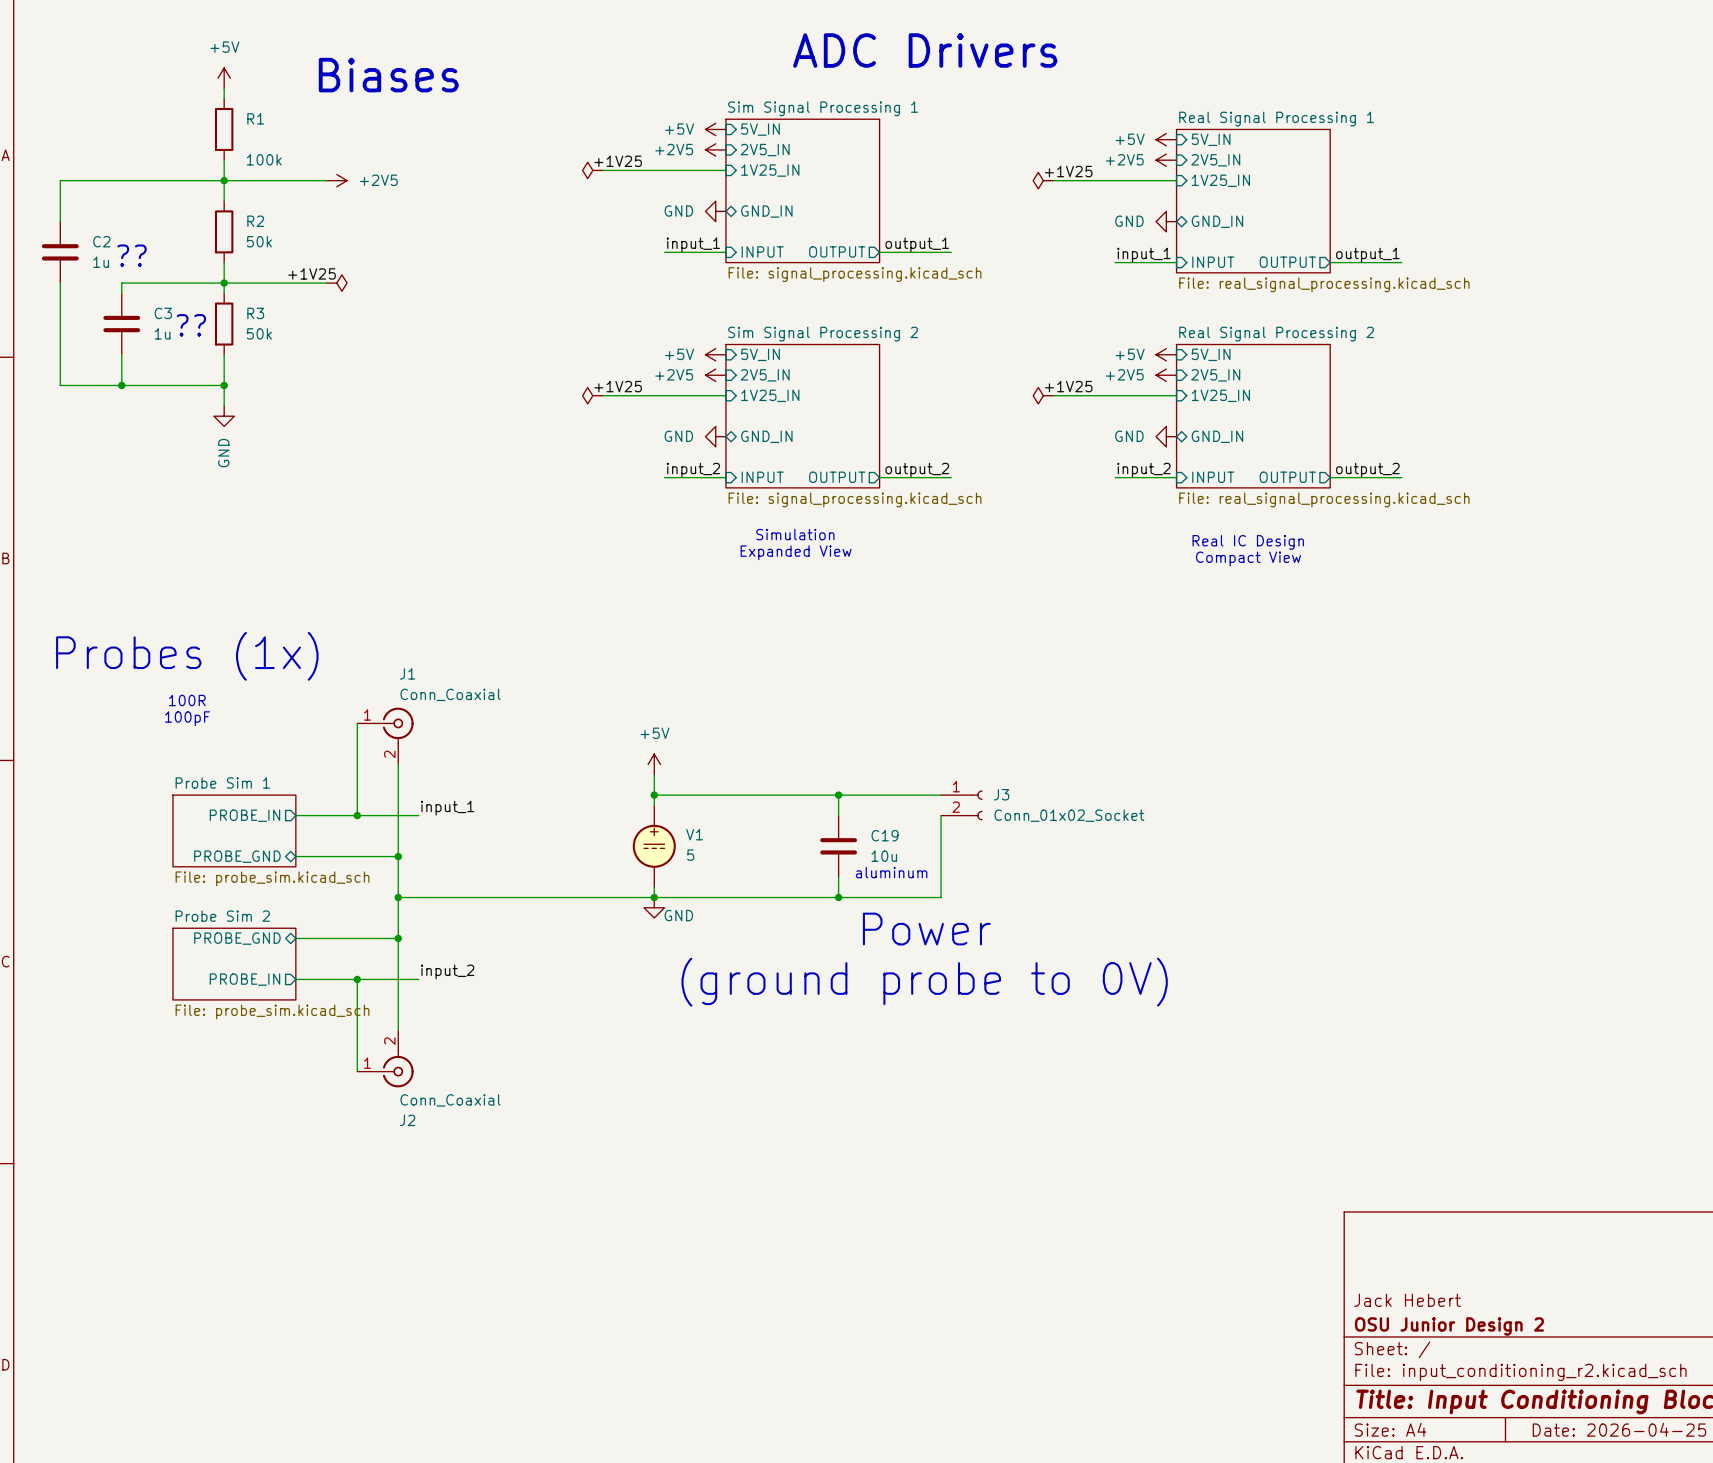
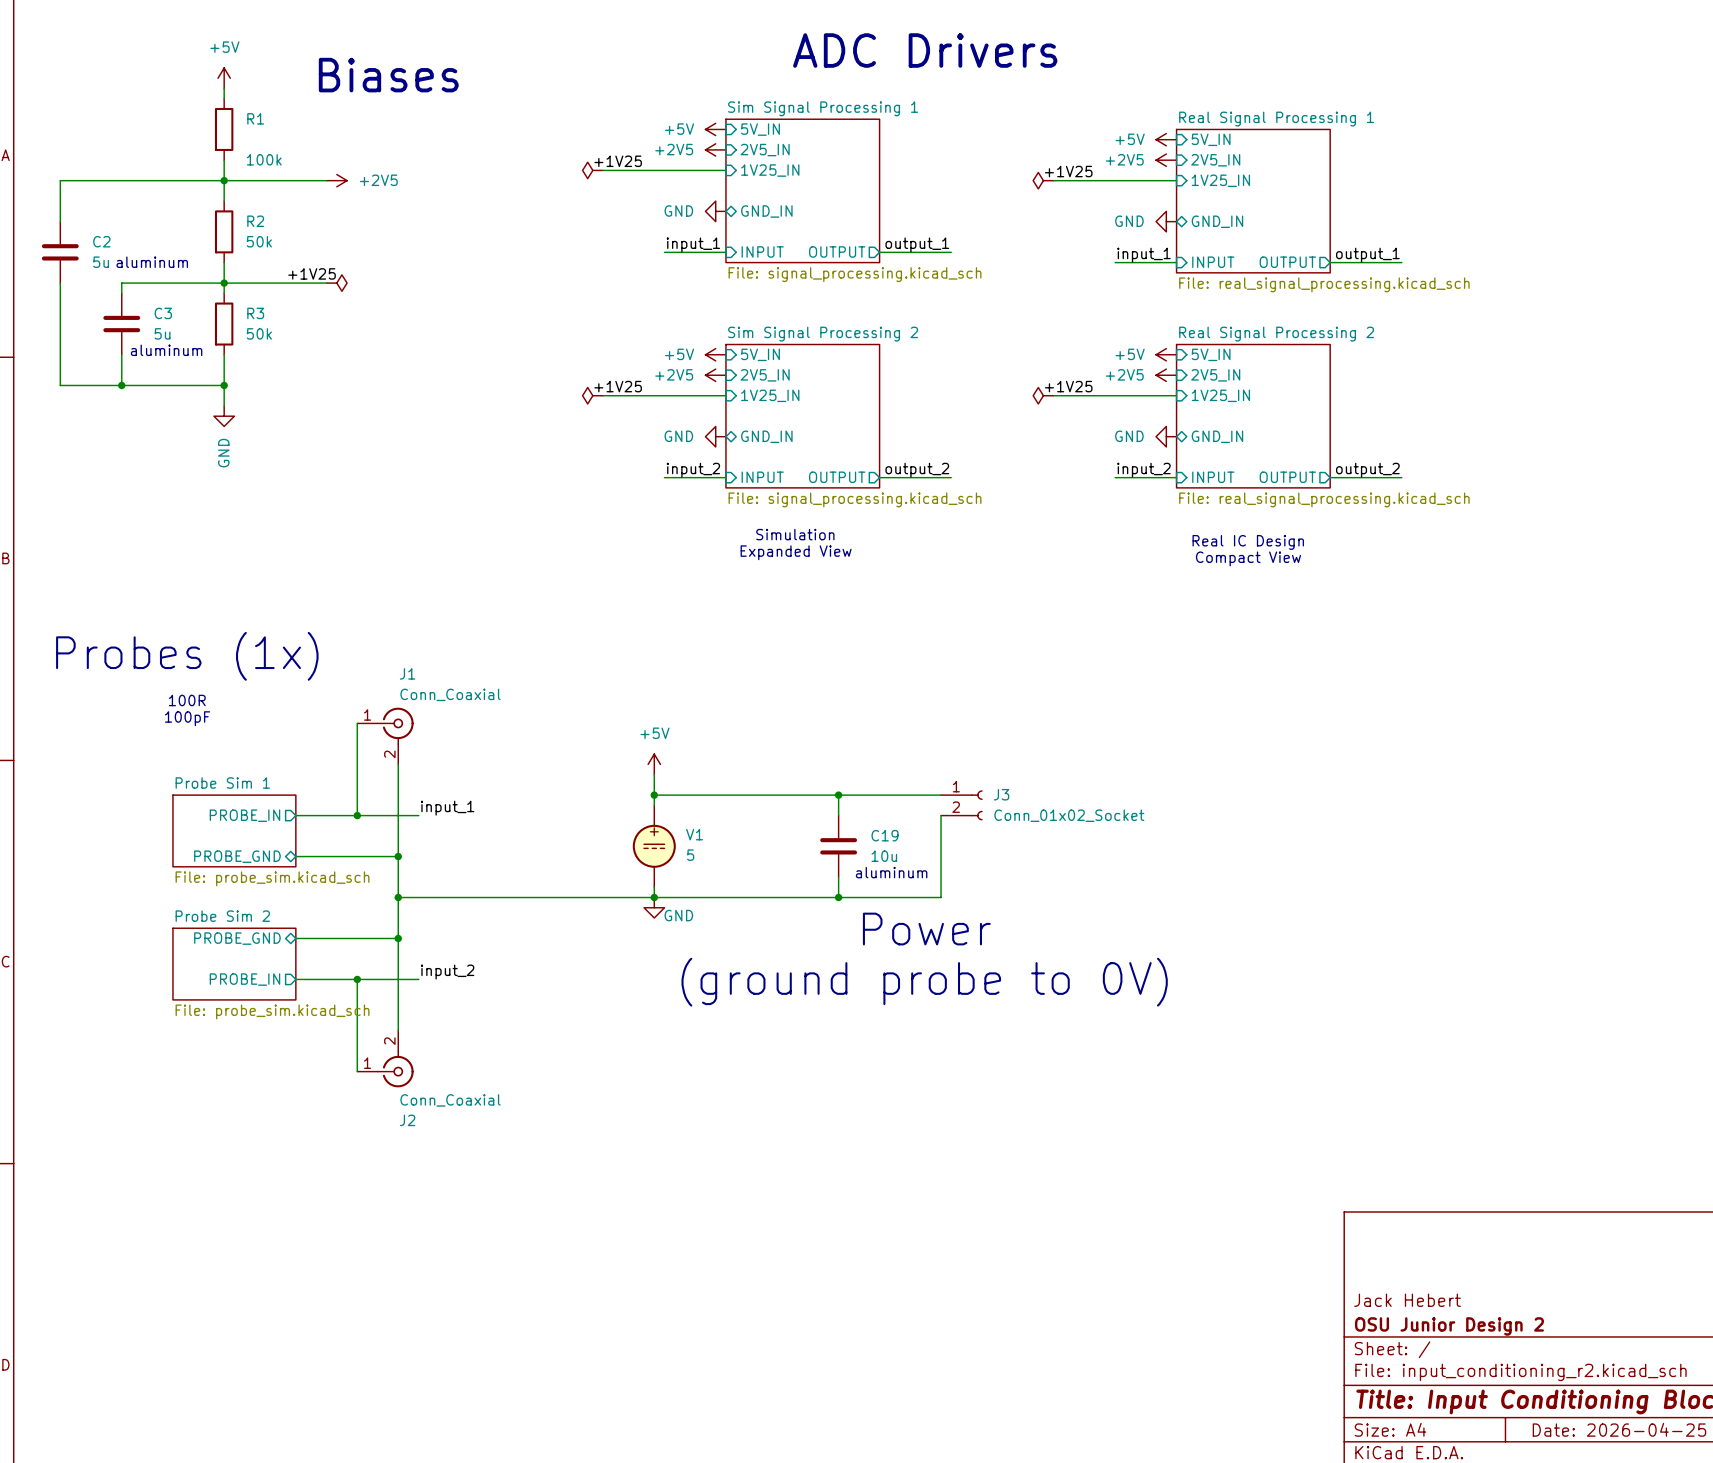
text: ?? (132, 255) -> none
C2 value: 1u (101, 262) -> 5u (101, 262)
text: none -> aluminum (152, 262)
text: ?? (191, 325) -> none
C3 value: 1u (162, 333) -> 5u (162, 333)
text: none -> aluminum (166, 350)

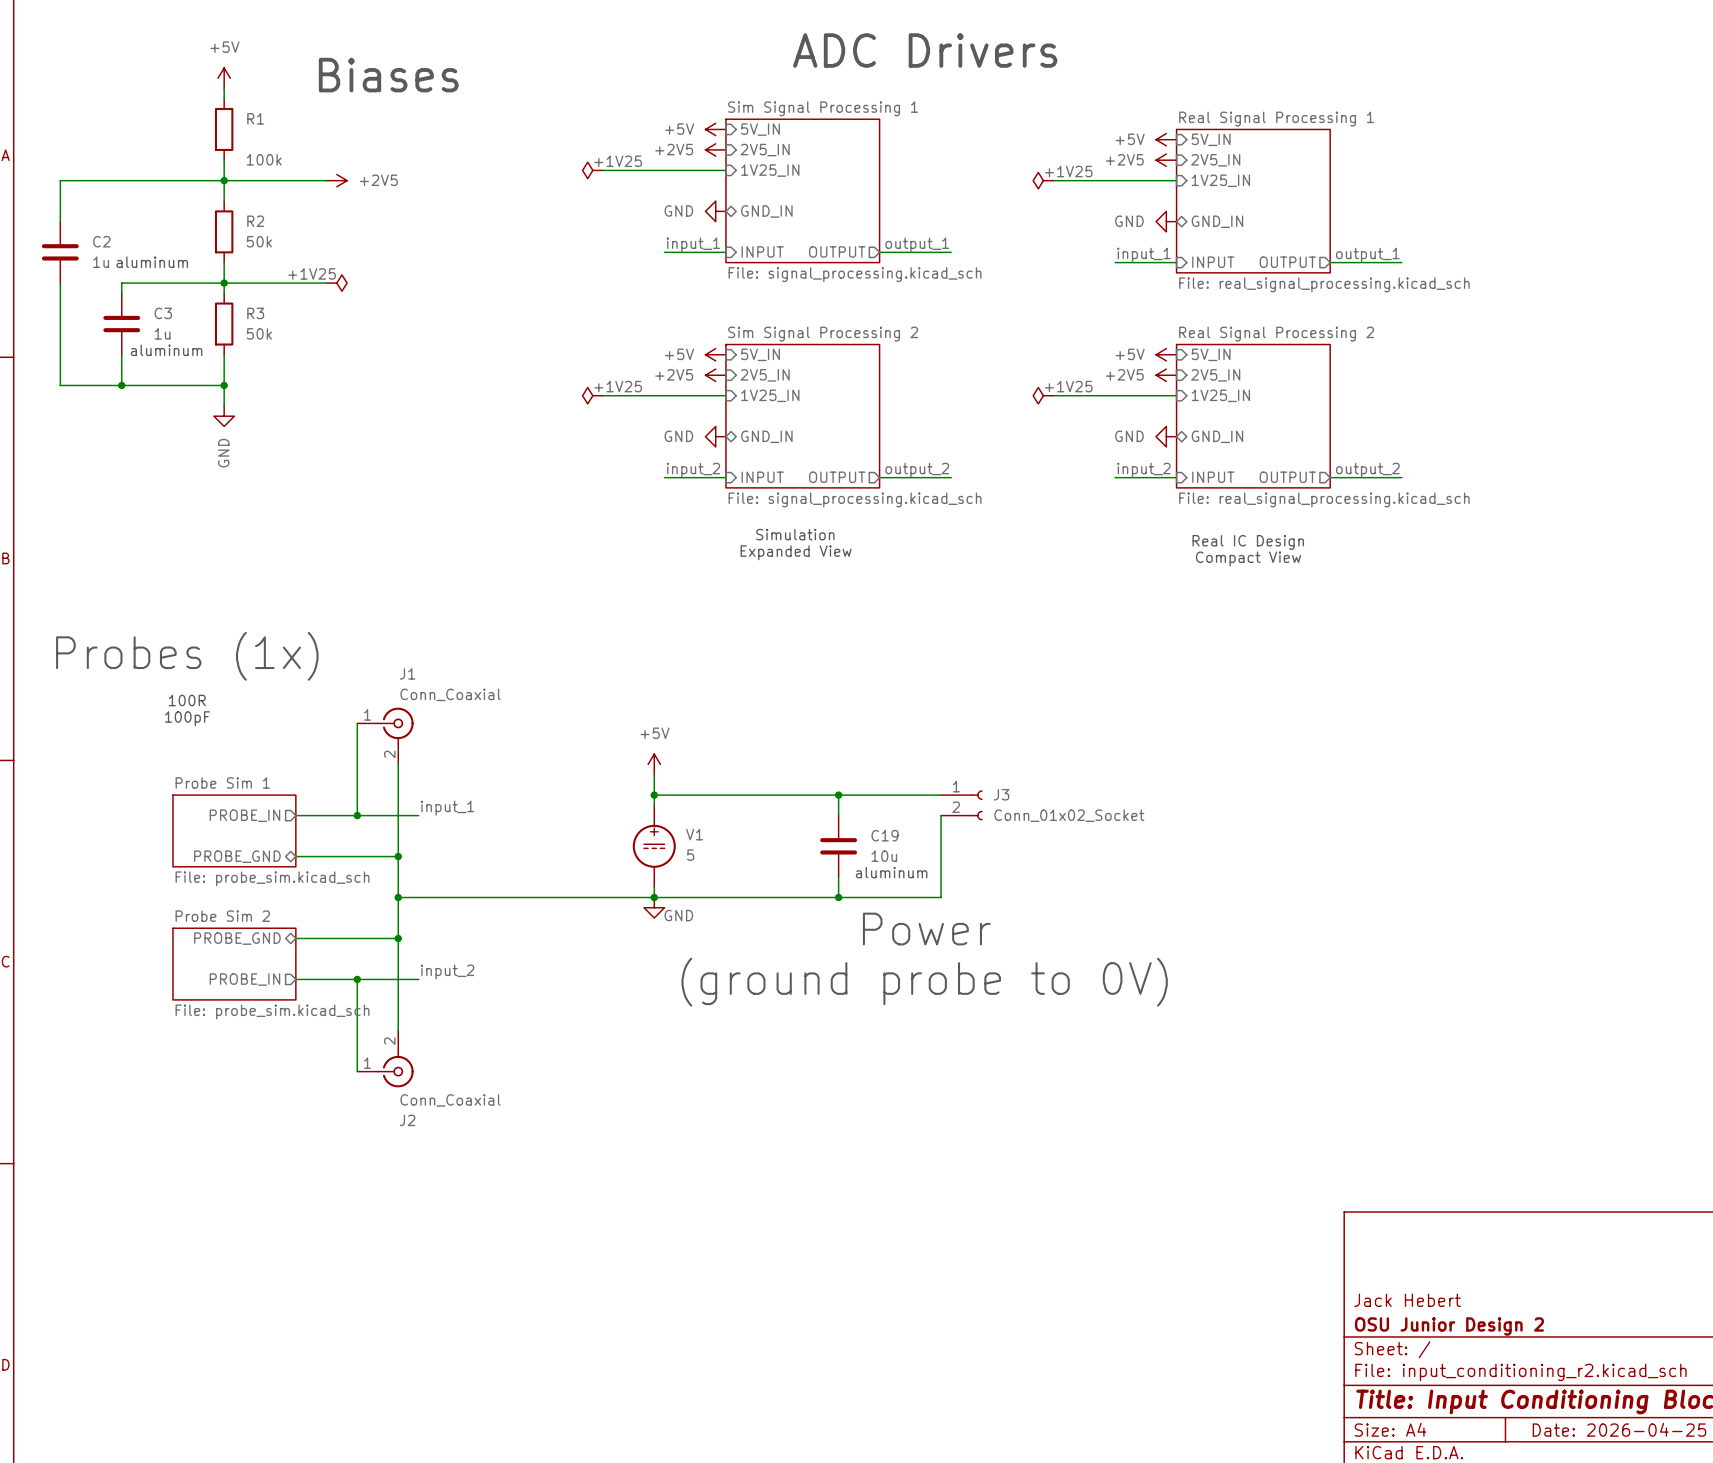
C2 value: 5u (101, 262) -> 1u (101, 262)
C3 value: 5u (162, 333) -> 1u (162, 333)

